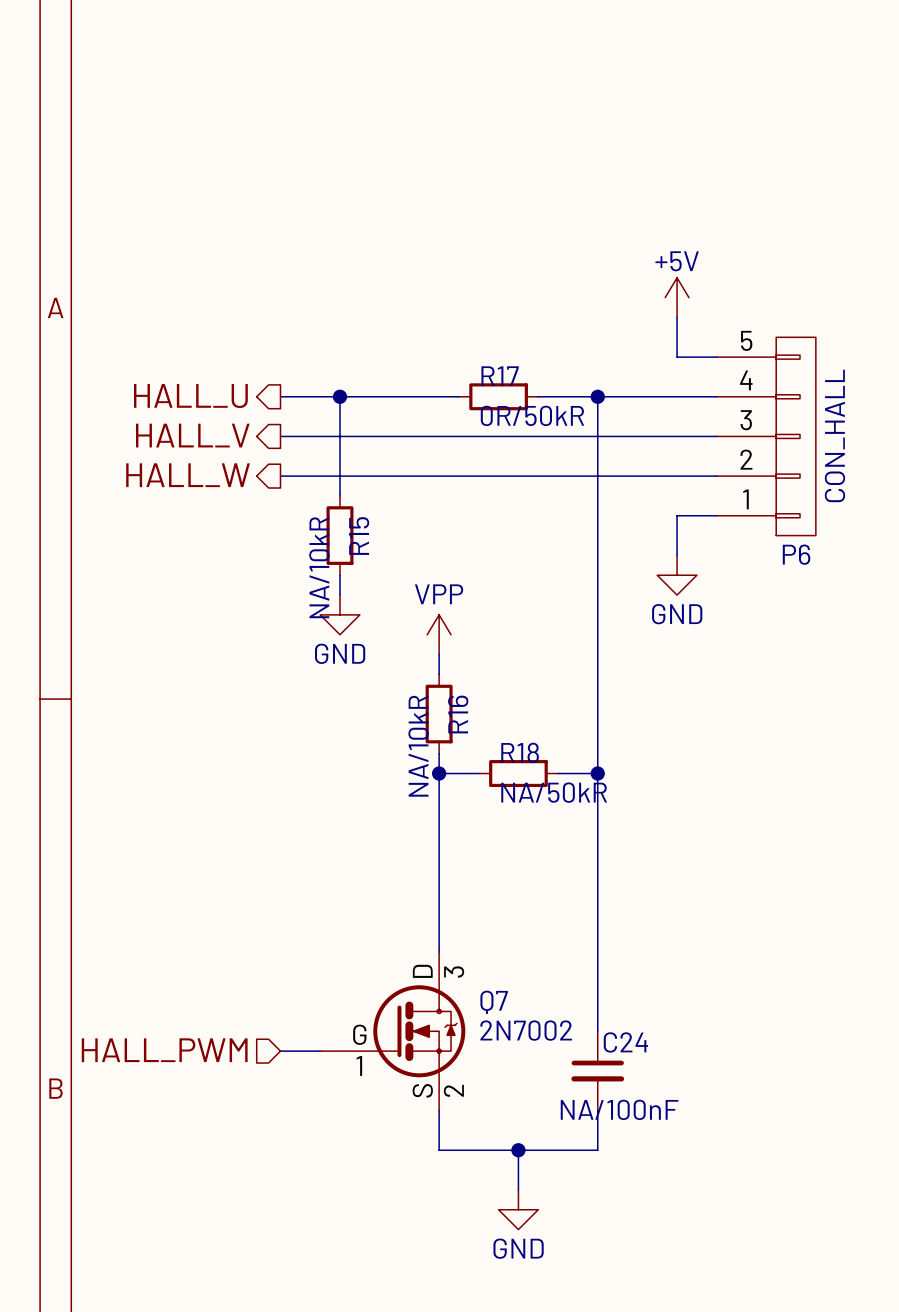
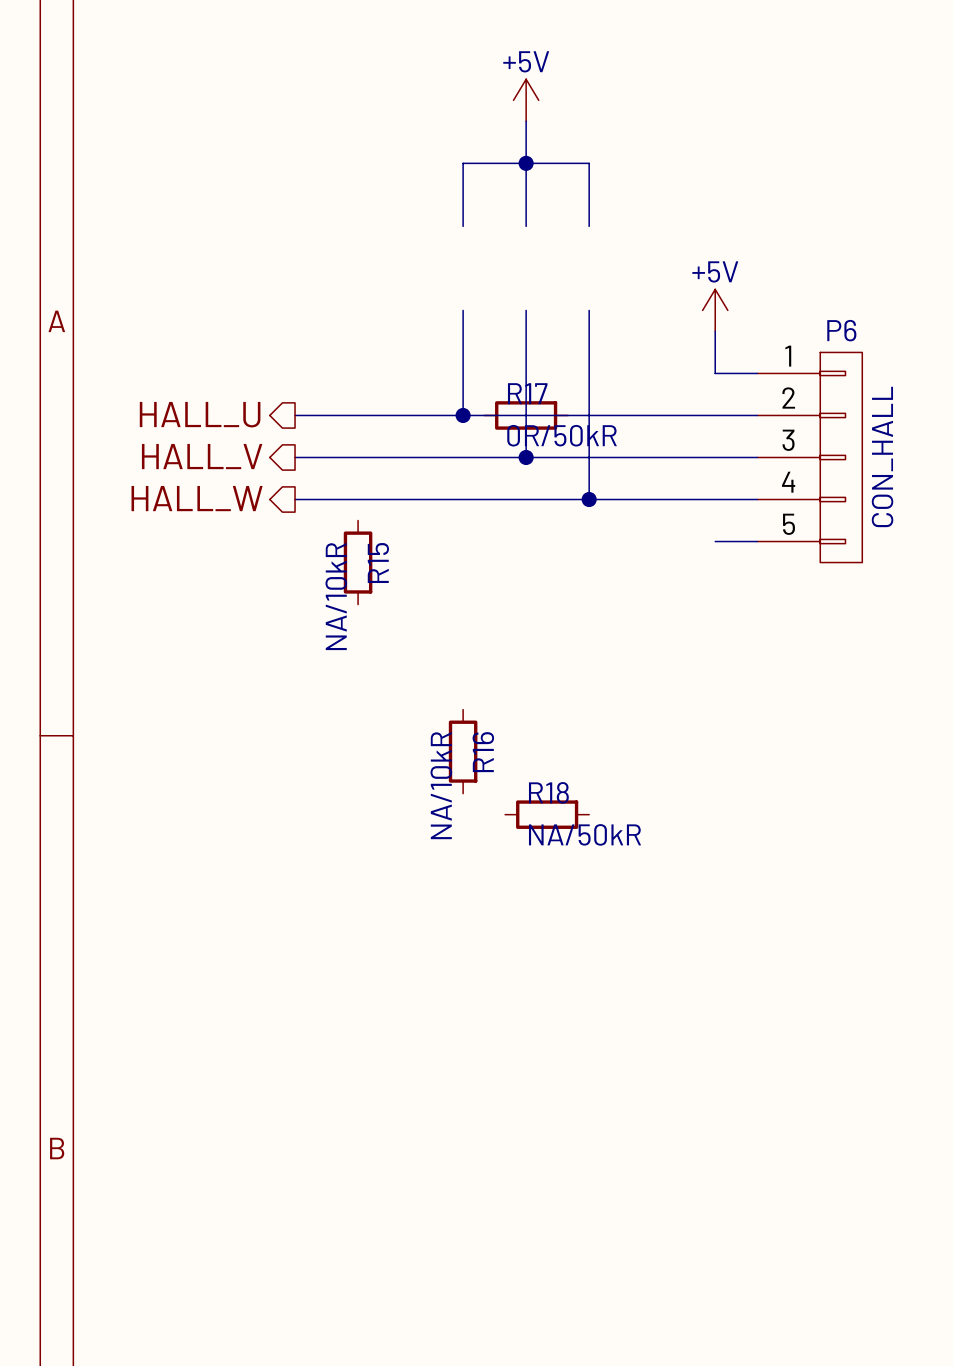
power symbol: none -> +5V (526, 100)
wire: none -> (526, 121) (526, 226)
junction: none -> (526, 163)
wire: none -> (463, 226) (463, 163) (589, 163) (589, 226)
wire: none -> (526, 310) (526, 457)
wire: none -> (589, 310) (589, 499)
wire: (339, 396) (339, 495) -> (463, 310) (463, 415)
junction: (339, 396) -> none
junction: none -> (463, 415)
wire: none -> (484, 415) (568, 415)
wire: (597, 396) (597, 1031) -> none
junction: (597, 396) -> none
junction: none -> (526, 457)
P6 flip: as is (796, 436) -> up-down (841, 457)
junction: none -> (589, 499)
wire: (677, 515) (677, 555) -> none
wire: (339, 575) (339, 595) -> none
power symbol: GND (677, 575) -> none
power symbol: GND (339, 614) -> none
power symbol: VPP (439, 634) -> none
wire: (439, 654) (439, 674) -> none
wire: (439, 753) (439, 951) -> none
wire: (439, 773) (478, 773) -> none
junction: (439, 773) -> none
wire: (558, 773) (597, 773) -> none
junction: (597, 773) -> none
Q7: 2N7002 (392, 1031) -> none
hierarchical label: HALL_PWM (164, 1050) -> none
wire: (280, 1051) (320, 1051) -> none
C24: NA/100nF (597, 1070) -> none
wire: (439, 1110) (439, 1150) (597, 1150) (597, 1110) -> none
wire: (518, 1150) (518, 1189) -> none
junction: (518, 1150) -> none
power symbol: GND (518, 1209) -> none

